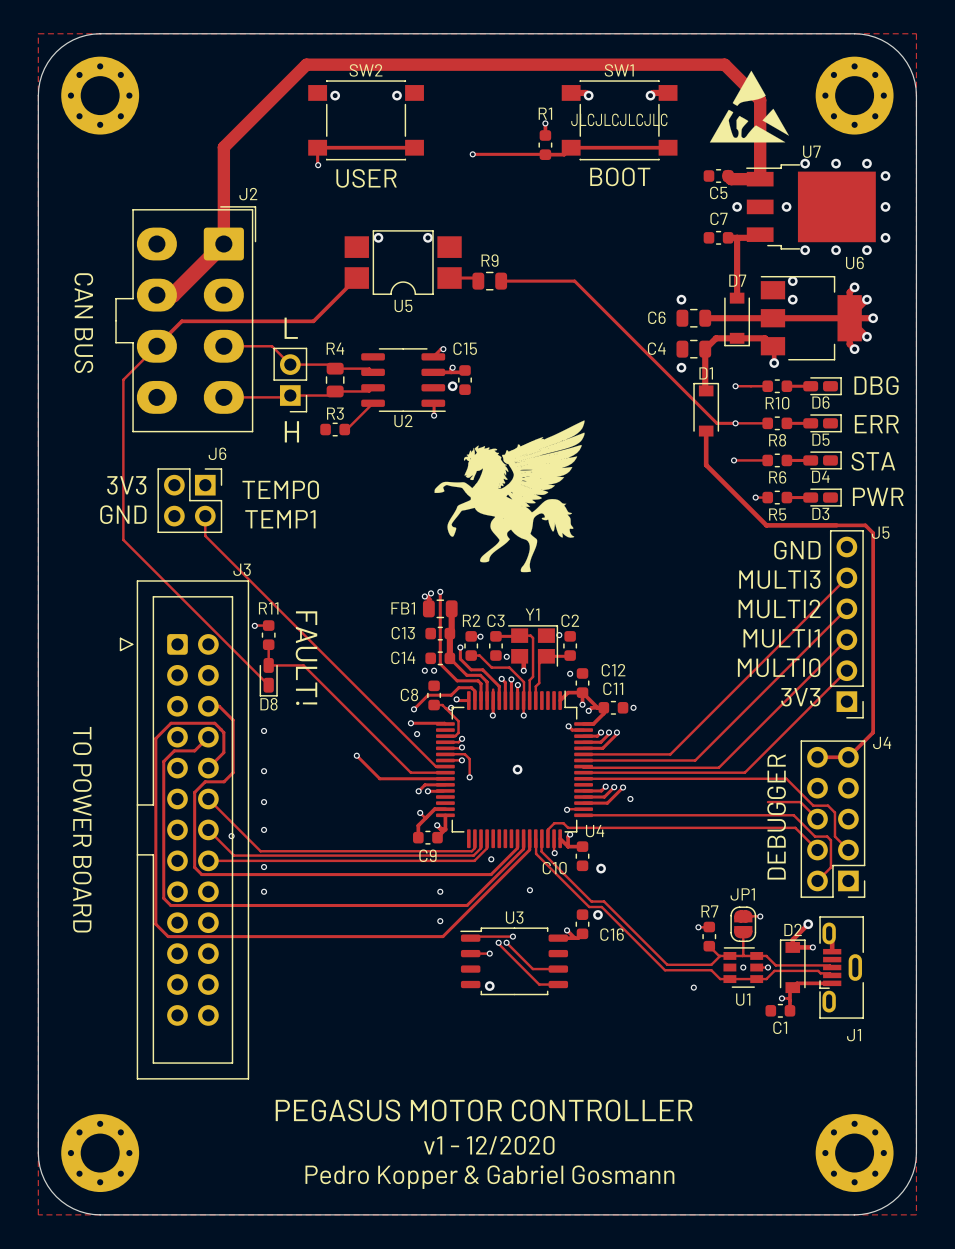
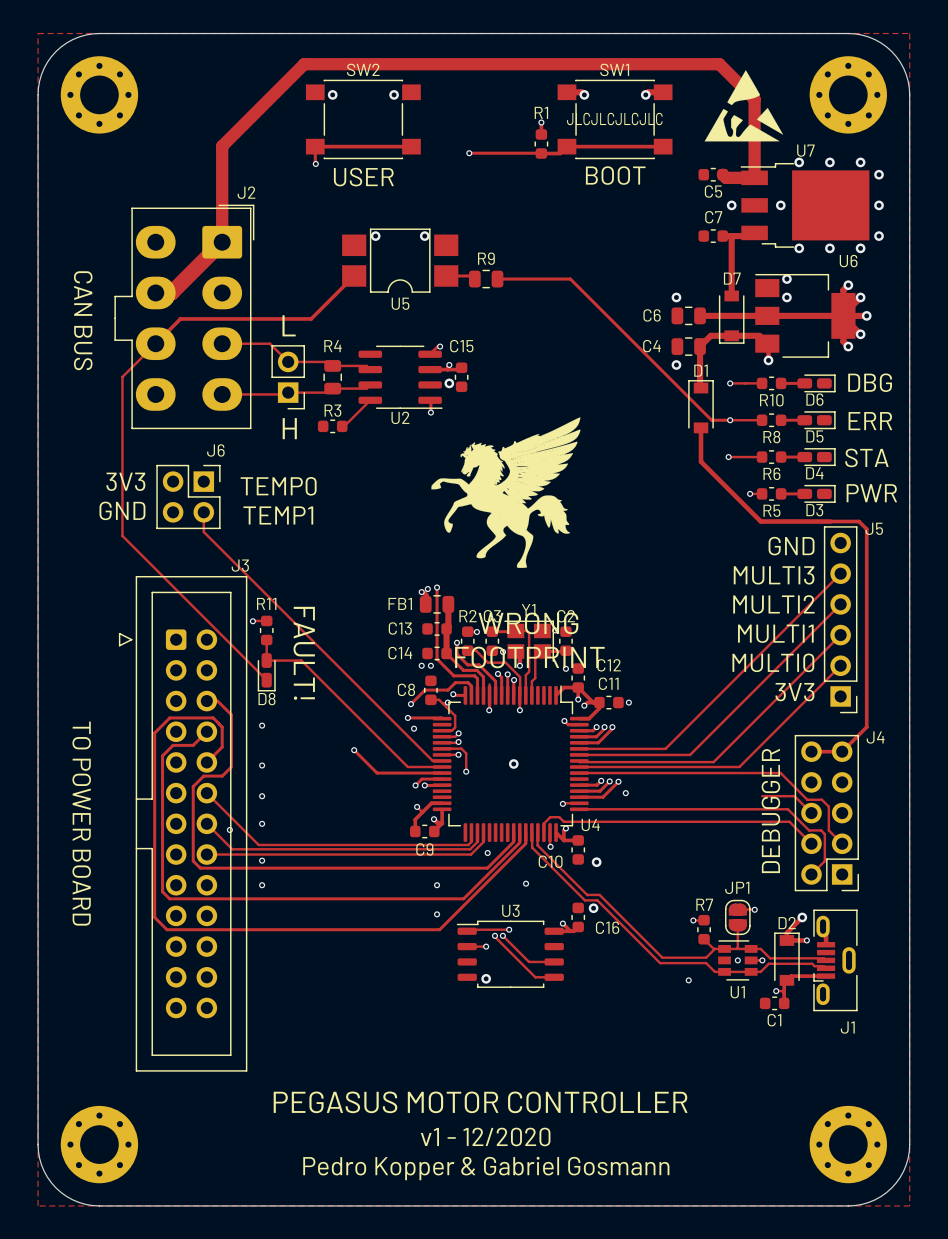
text: none -> WRONG (528, 623)
text: none -> FOOTPRINT (529, 657)

